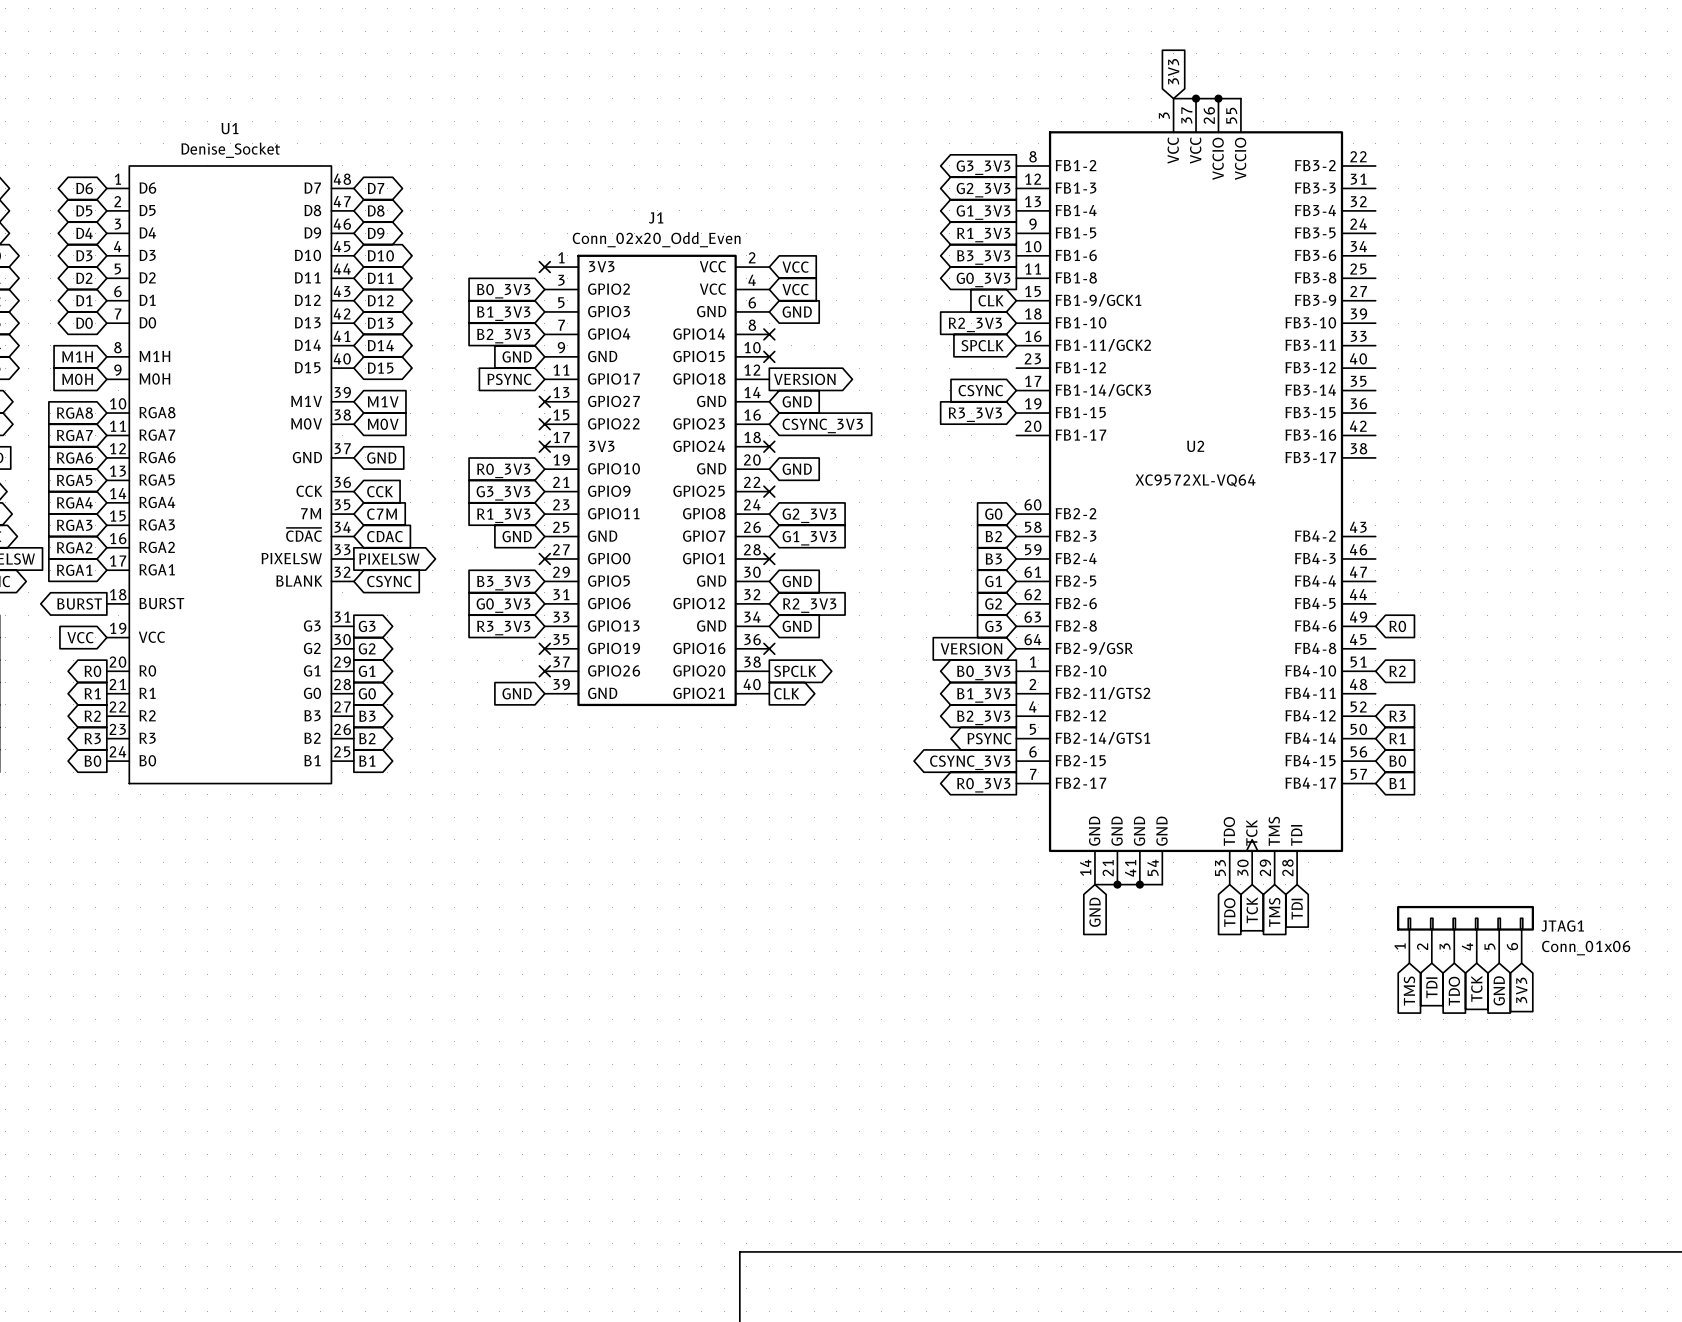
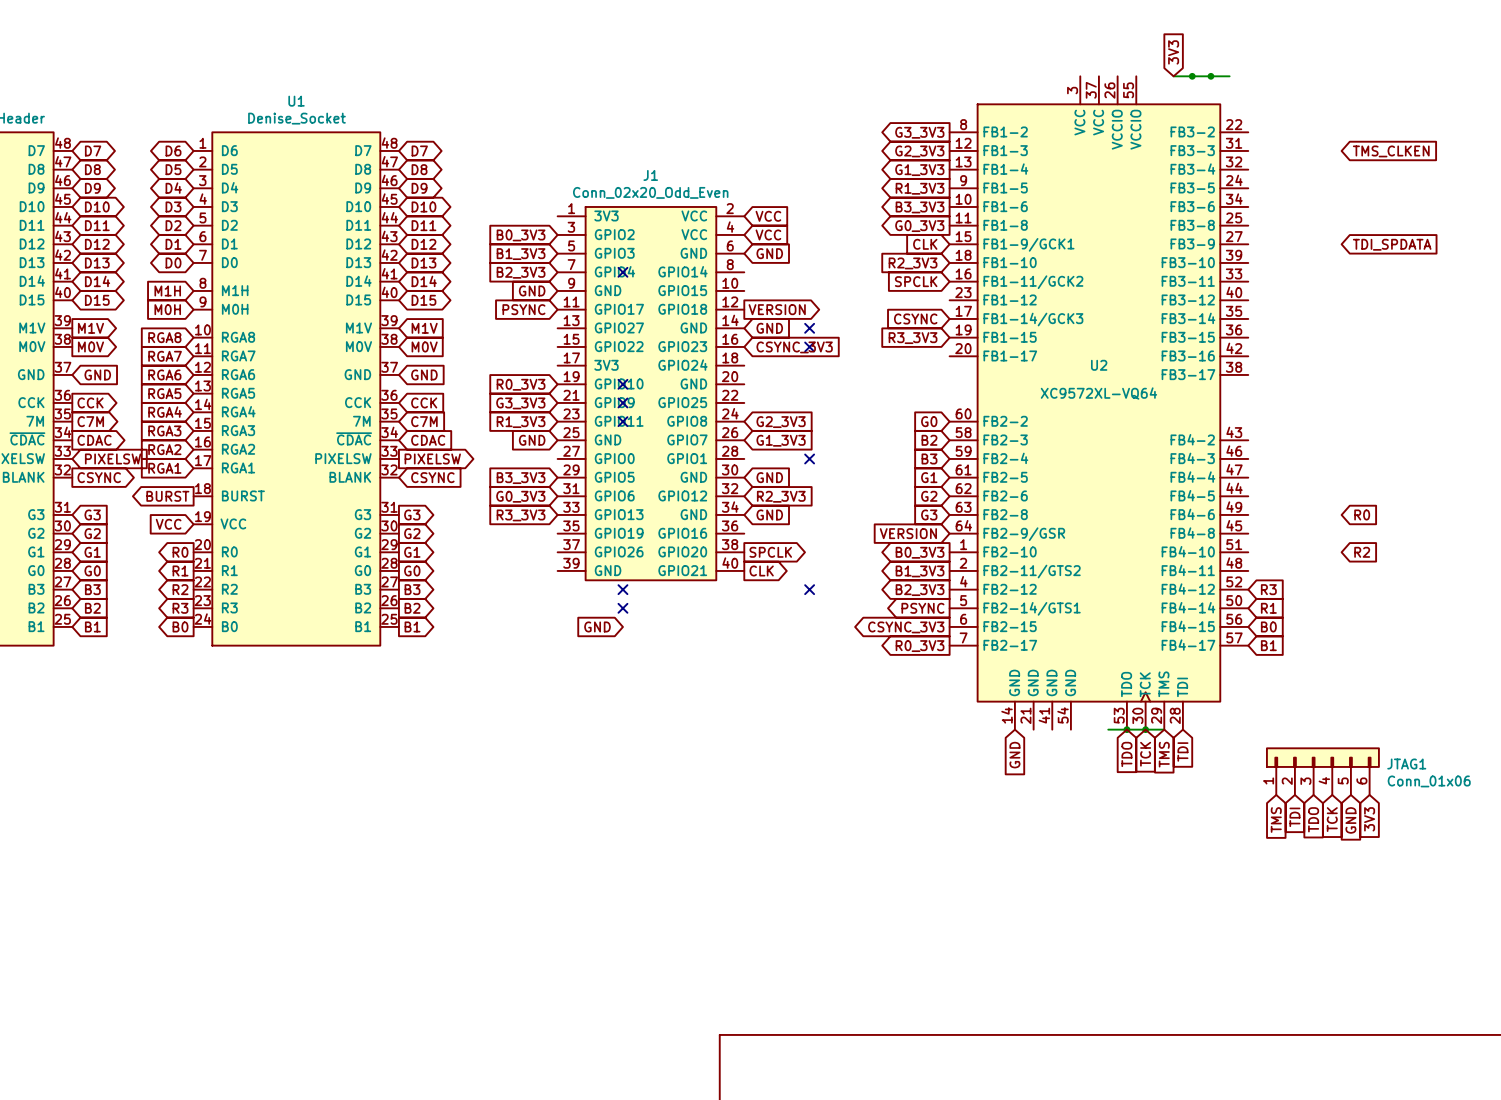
global label position: 3V3 (1173, 71) -> 3V3 (1173, 52)
wire: (1173, 98) (1240, 98) -> (1173, 76) (1229, 76)
junction: (1196, 98) -> none
junction: (1218, 98) -> none
junction: none -> (1192, 76)
junction: none -> (1210, 76)
global label: none -> TMS_CLKEN (1391, 151)
no-connect mark: (544, 267) -> none
global label: none -> TDI_SPDATA (1392, 244)
no-connect mark: none -> (622, 272)
no-connect mark: (769, 334) -> none
no-connect mark: (769, 356) -> none
no-connect mark: (544, 401) -> none
no-connect mark: none -> (809, 328)
no-connect mark: (544, 424) -> none
no-connect mark: none -> (809, 346)
no-connect mark: (544, 446) -> none
no-connect mark: (769, 446) -> none
no-connect mark: none -> (622, 384)
global label: GND (797, 469) -> none
no-connect mark: none -> (622, 402)
no-connect mark: (769, 491) -> none
no-connect mark: none -> (622, 421)
no-connect mark: (544, 558) -> none
no-connect mark: (769, 558) -> none
no-connect mark: none -> (809, 458)
global label position: R0 (1397, 626) -> R0 (1362, 514)
no-connect mark: (544, 648) -> none
no-connect mark: (769, 648) -> none
no-connect mark: (544, 671) -> none
global label position: R2 (1397, 671) -> R2 (1362, 552)
global label position: GND (517, 693) -> GND (597, 626)
no-connect mark: none -> (622, 589)
no-connect mark: none -> (809, 589)
no-connect mark: none -> (622, 608)
wire: (1094, 884) (1162, 884) -> (1108, 729) (1164, 729)
junction: (1117, 884) -> none
junction: (1139, 884) -> none
junction: none -> (1126, 729)
junction: none -> (1145, 729)

